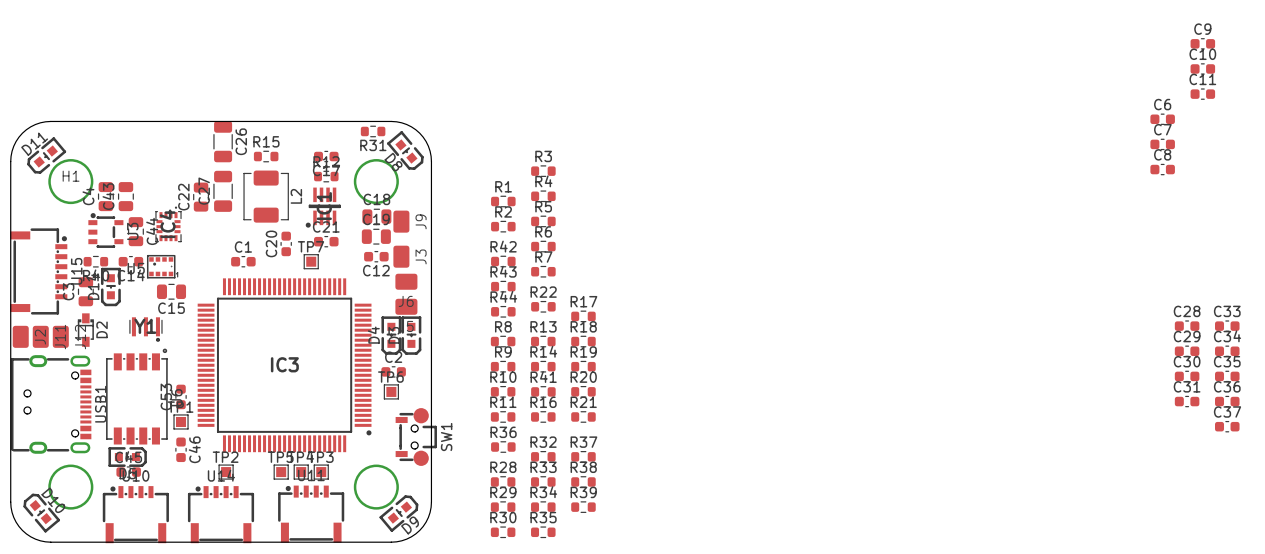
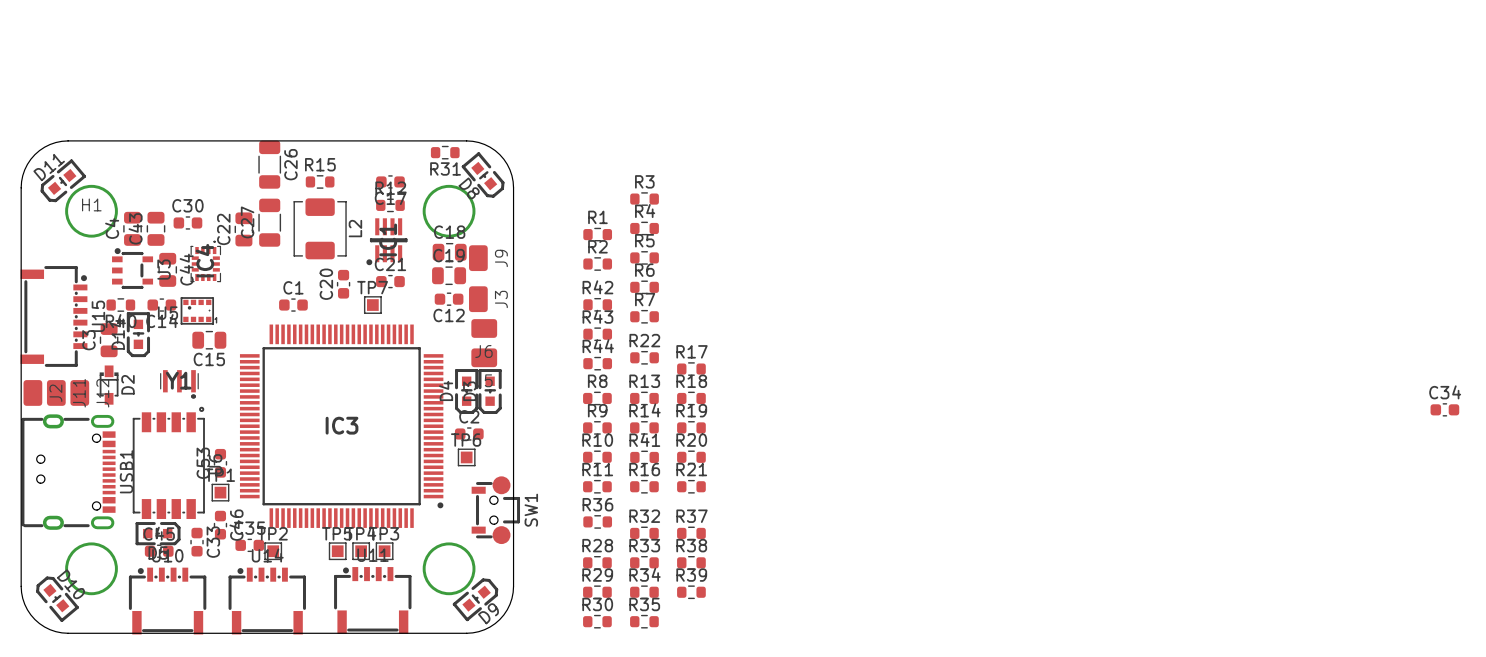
C9: (1202, 43) -> none
C10: (1202, 68) -> none
C11: (1202, 94) -> none
C6: (1162, 119) -> none
C7: (1162, 144) -> none
C8: (1162, 169) -> none
C28: (1187, 326) -> none
C33 rotation: 0° (1227, 326) -> 90° clockwise (197, 542)
C33 position: (1227, 326) -> (197, 542)
C29: (1187, 351) -> none
C30 position: (1187, 376) -> (187, 222)
C35 position: (1227, 376) -> (249, 545)
C31: (1187, 401) -> none
C36: (1227, 401) -> none
C37: (1227, 426) -> none

